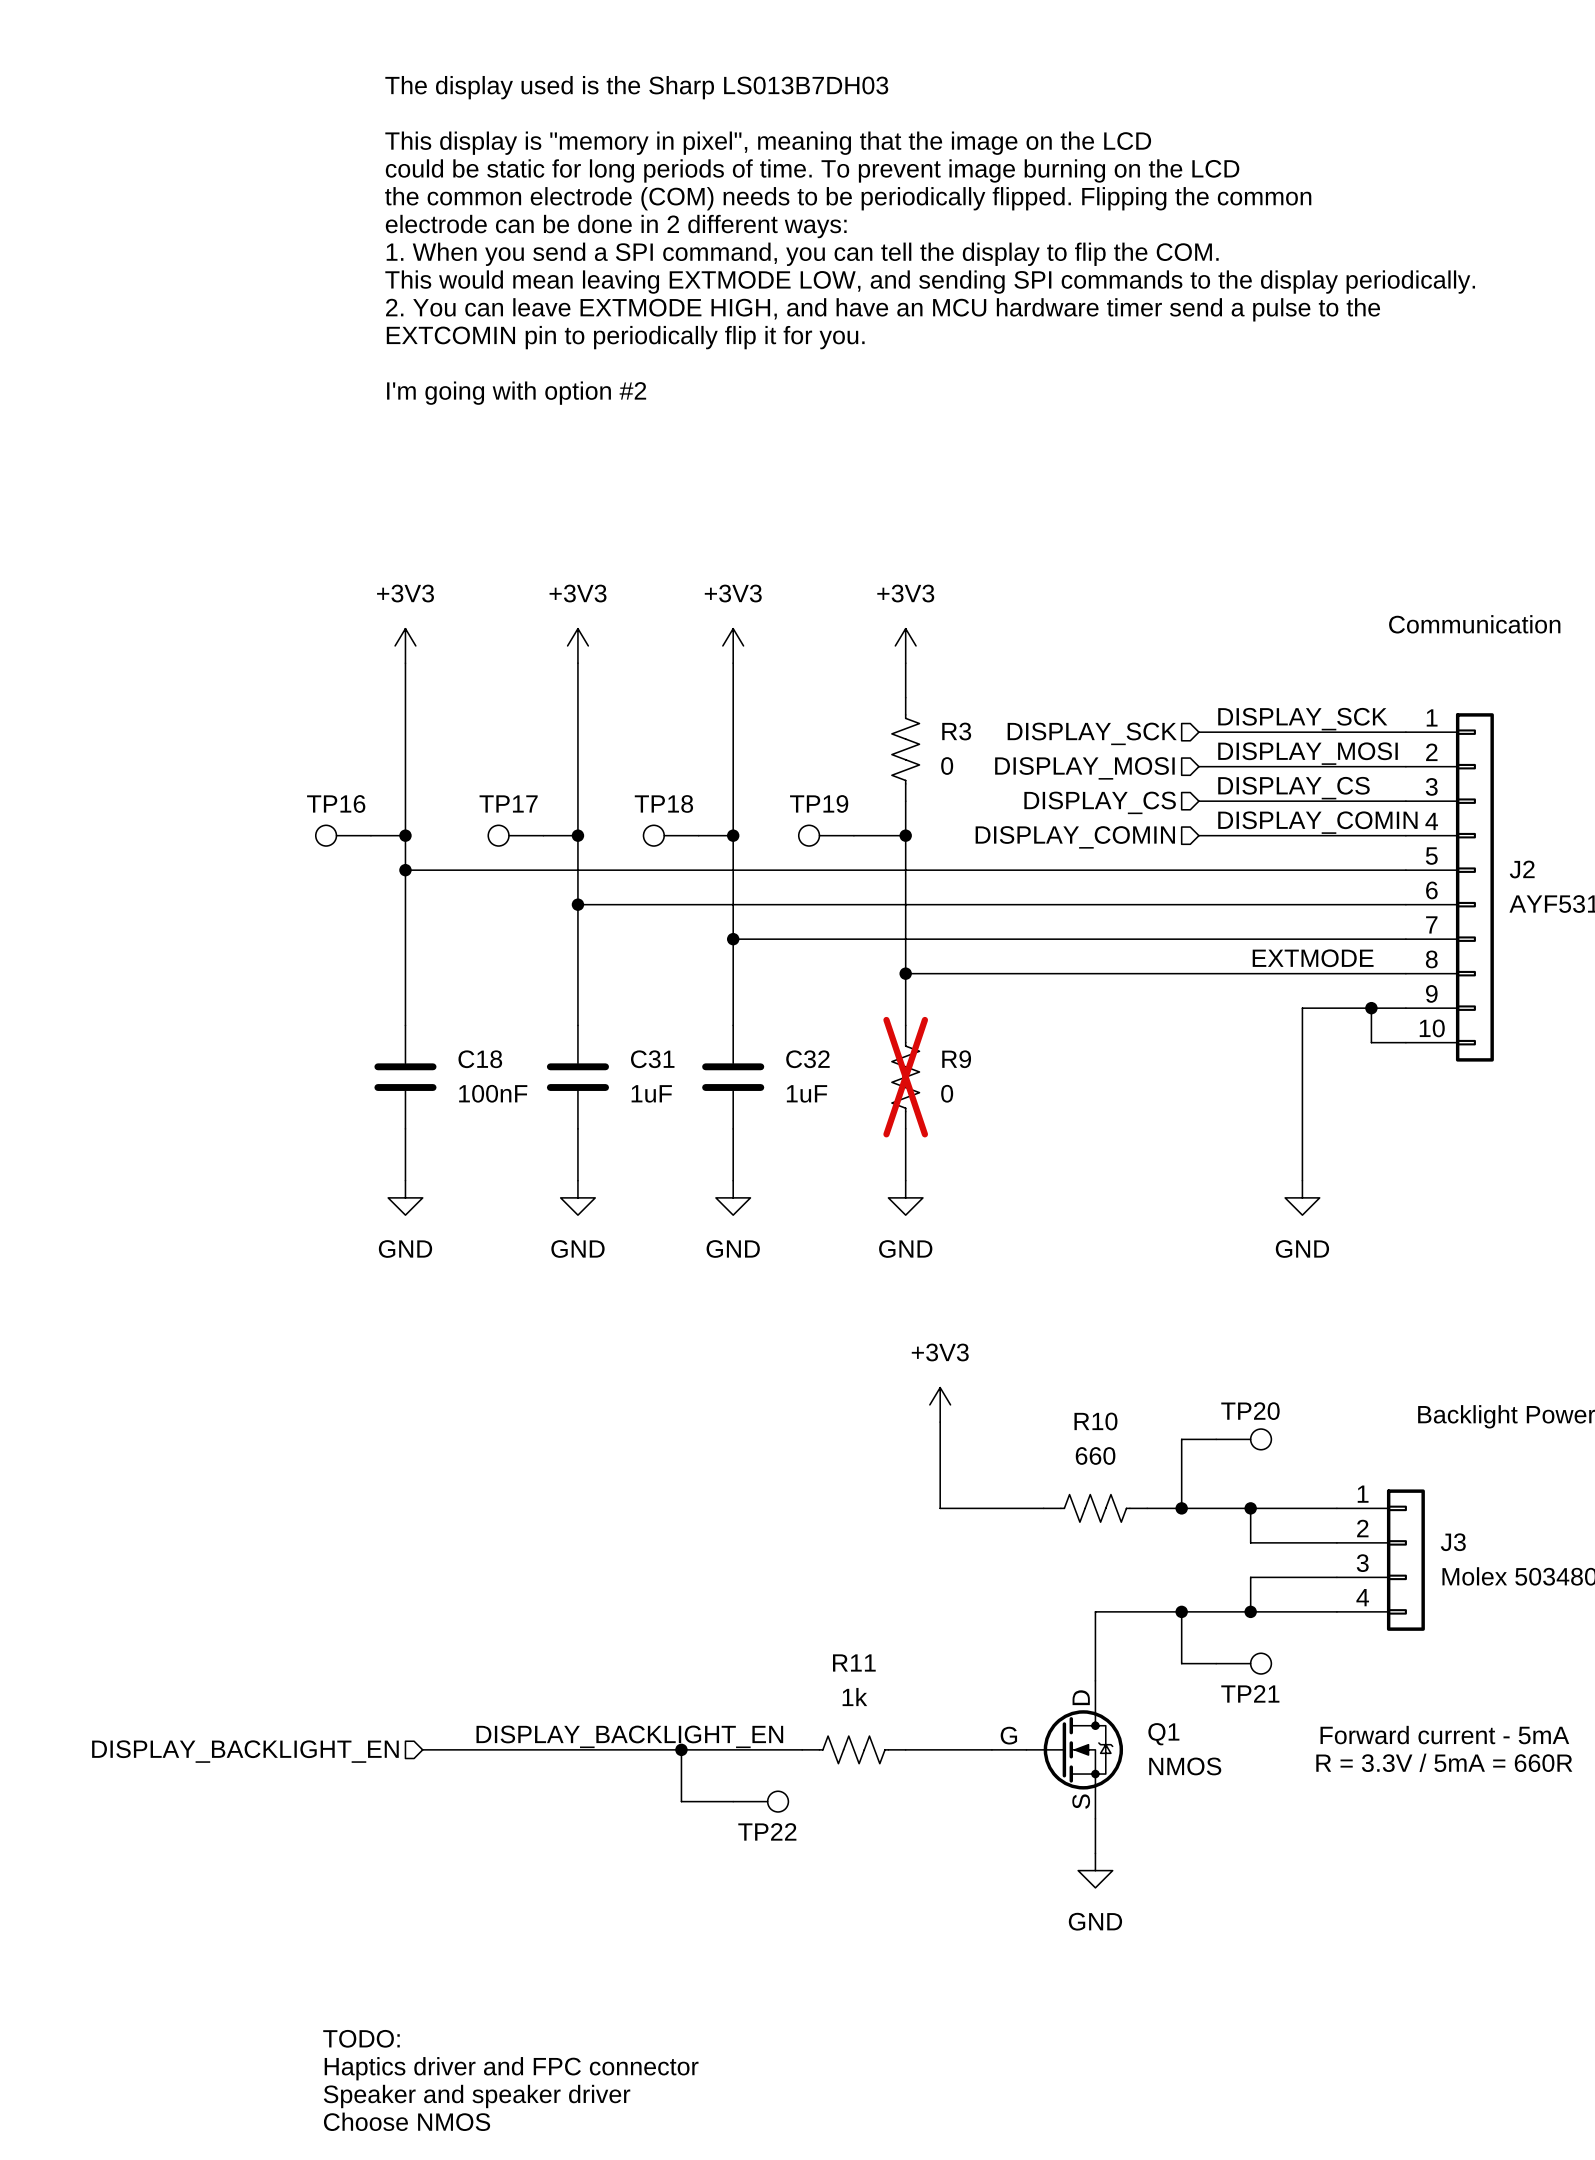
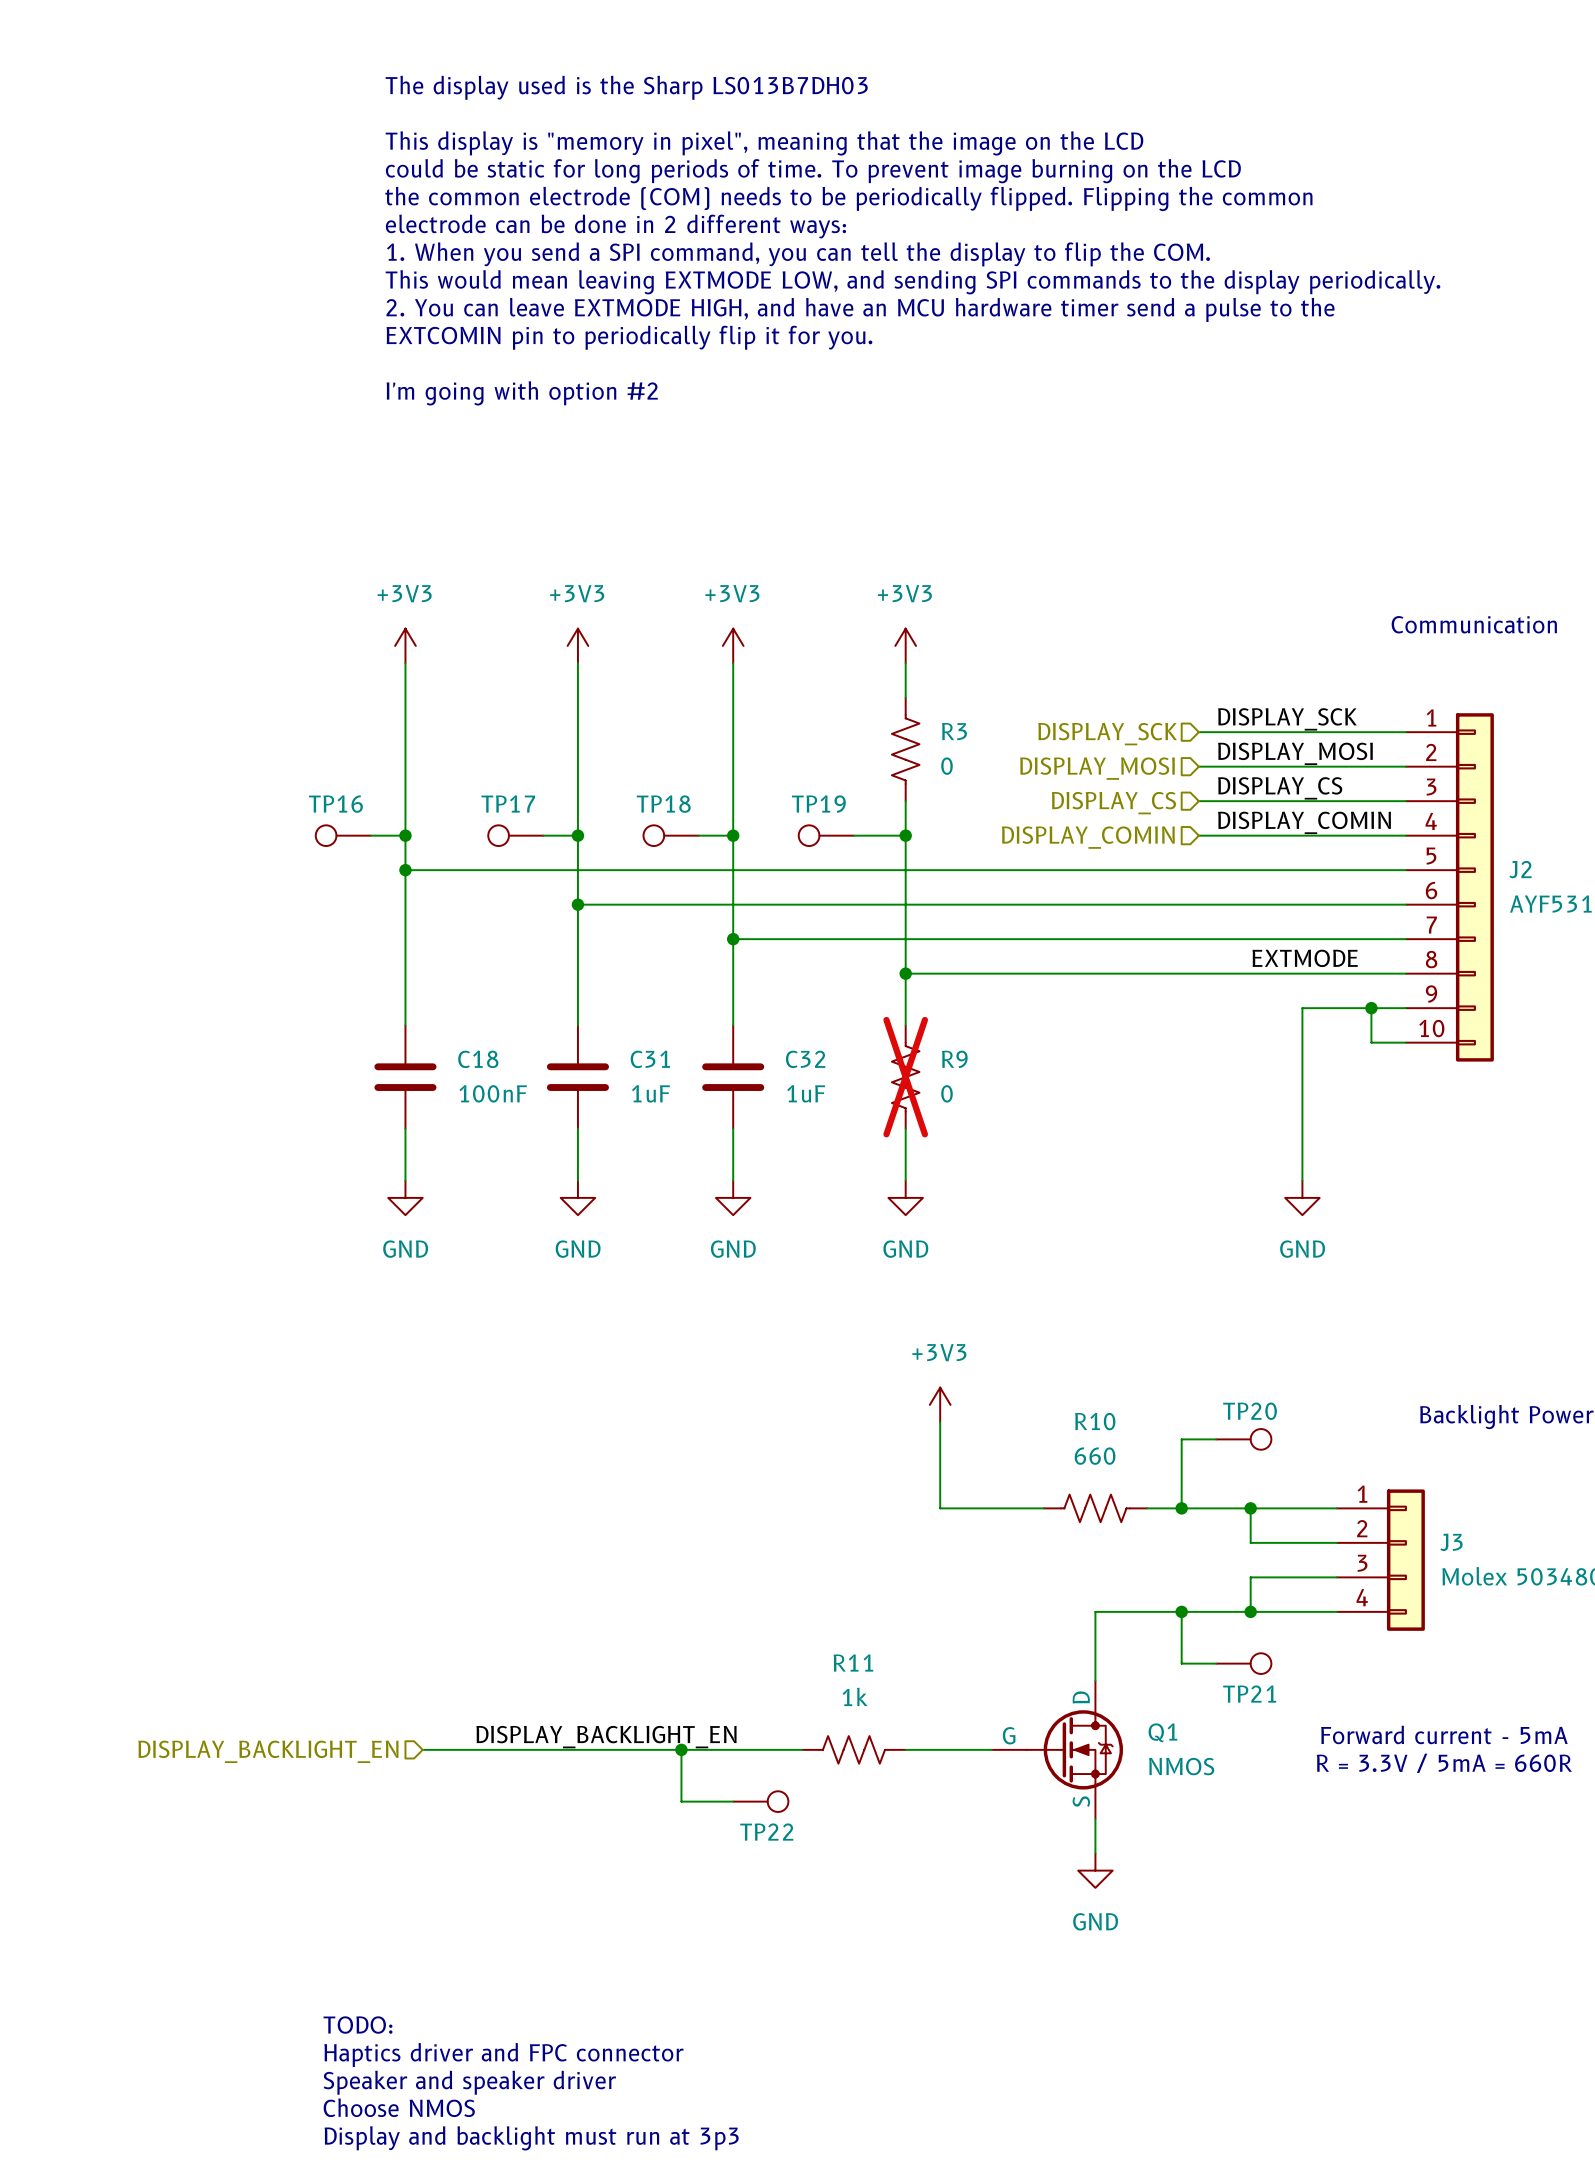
text position: TODO: (361, 2038) -> TODO: (358, 2025)
text position: Haptics driver and FPC connector (511, 2068) -> Haptics driver and FPC connector (503, 2054)
text position: Speaker and speaker driver (477, 2096) -> Speaker and speaker driver (469, 2082)
text position: Choose NMOS (407, 2121) -> Choose NMOS (399, 2107)
text: none -> Display and backlight must run at 3p3 (531, 2138)

